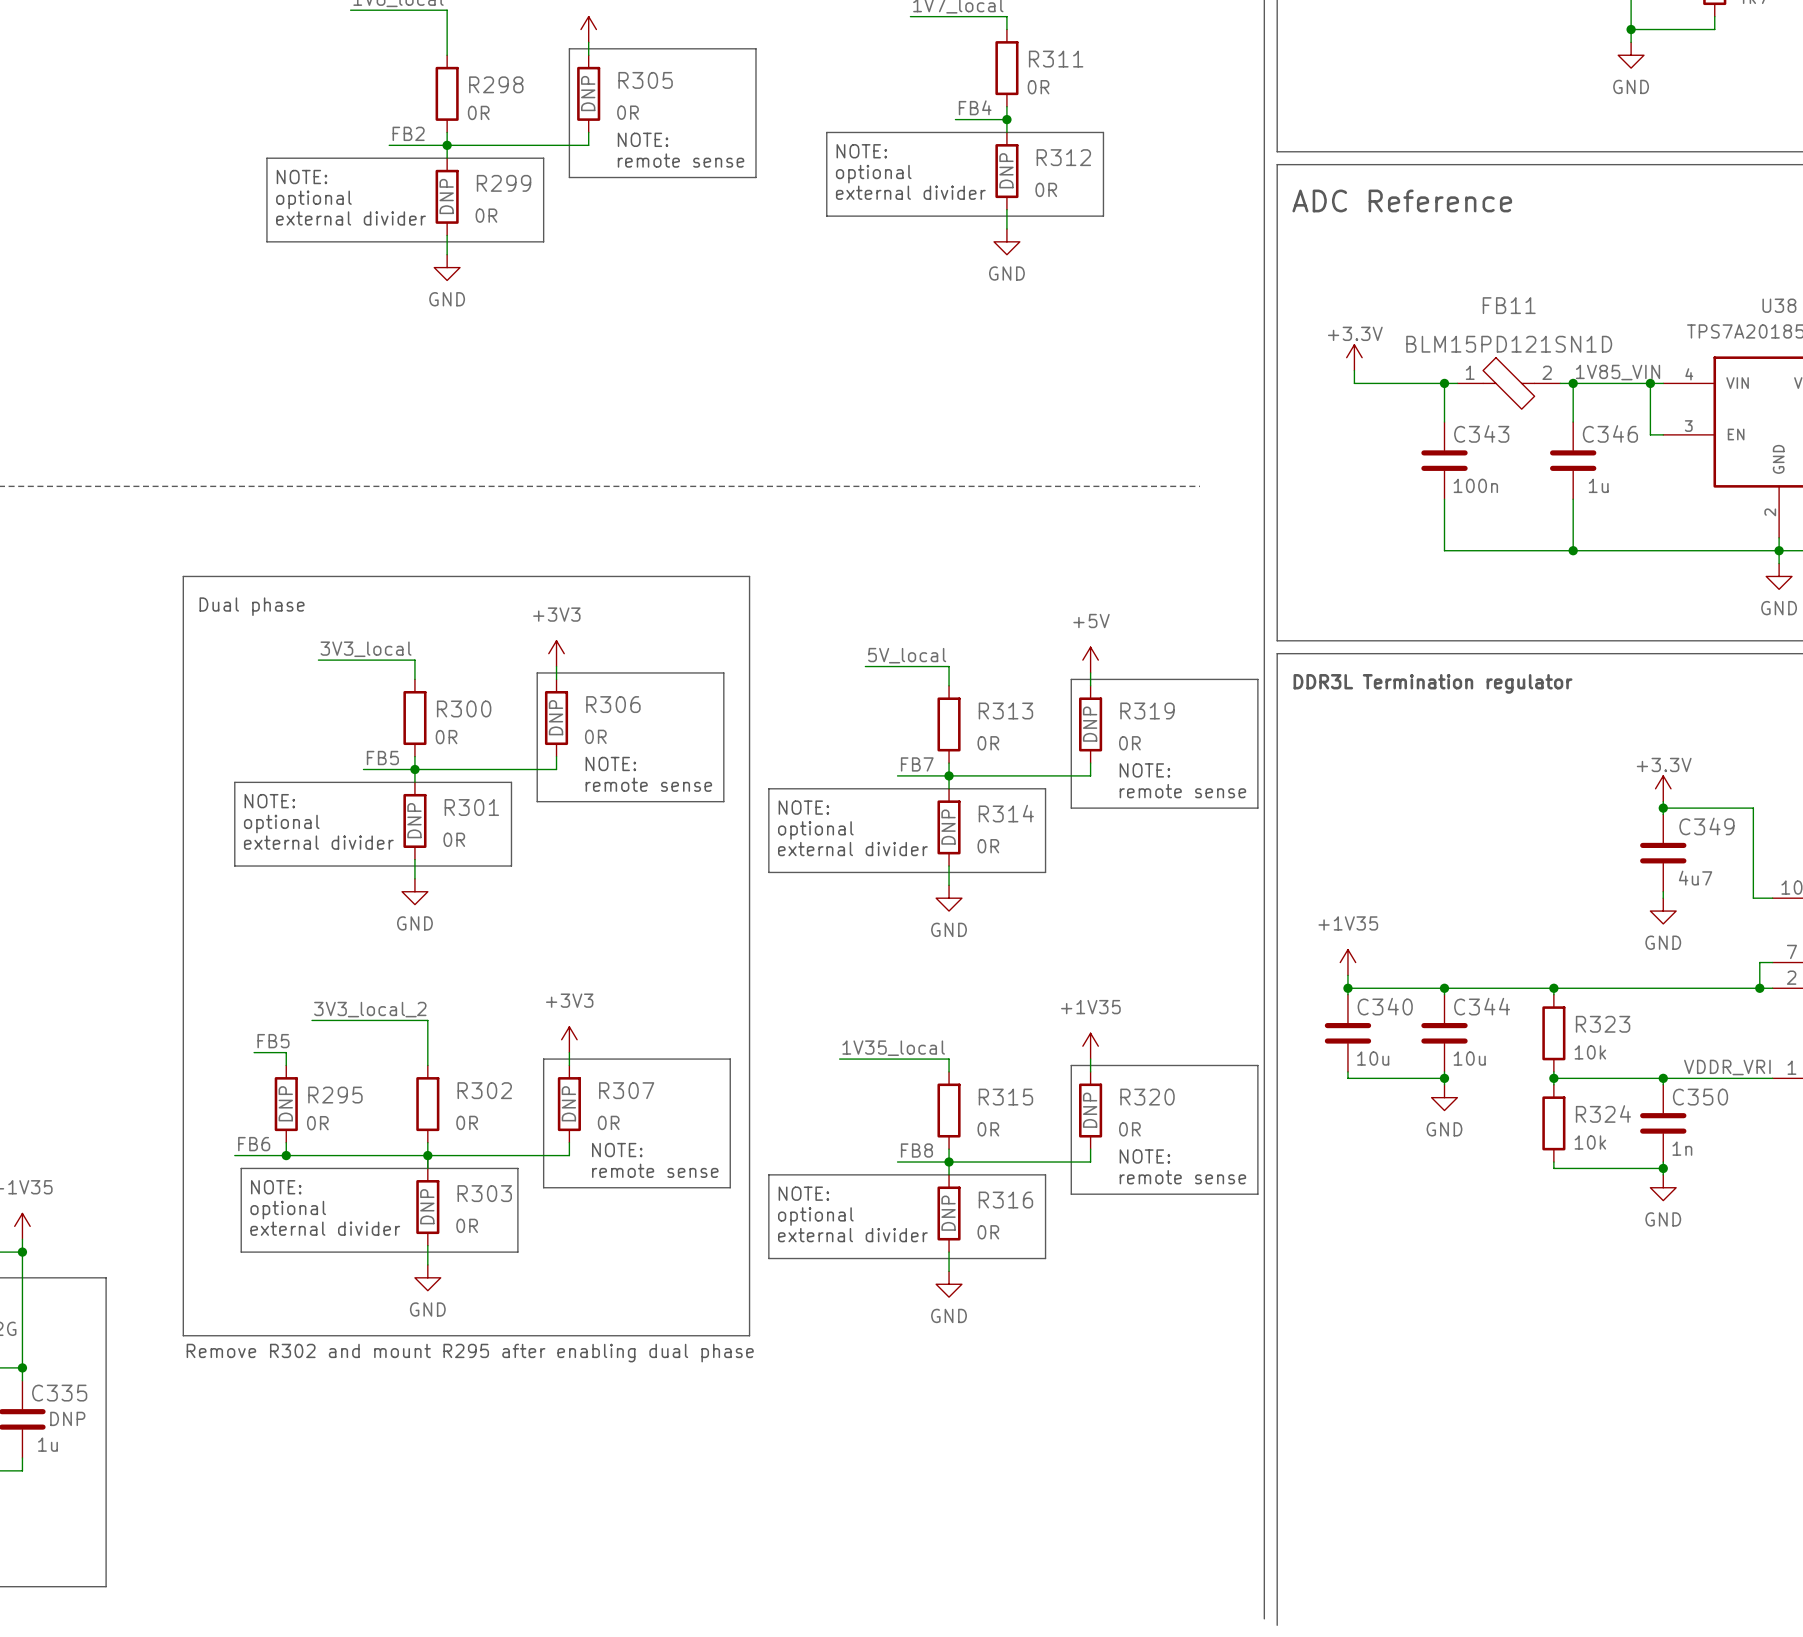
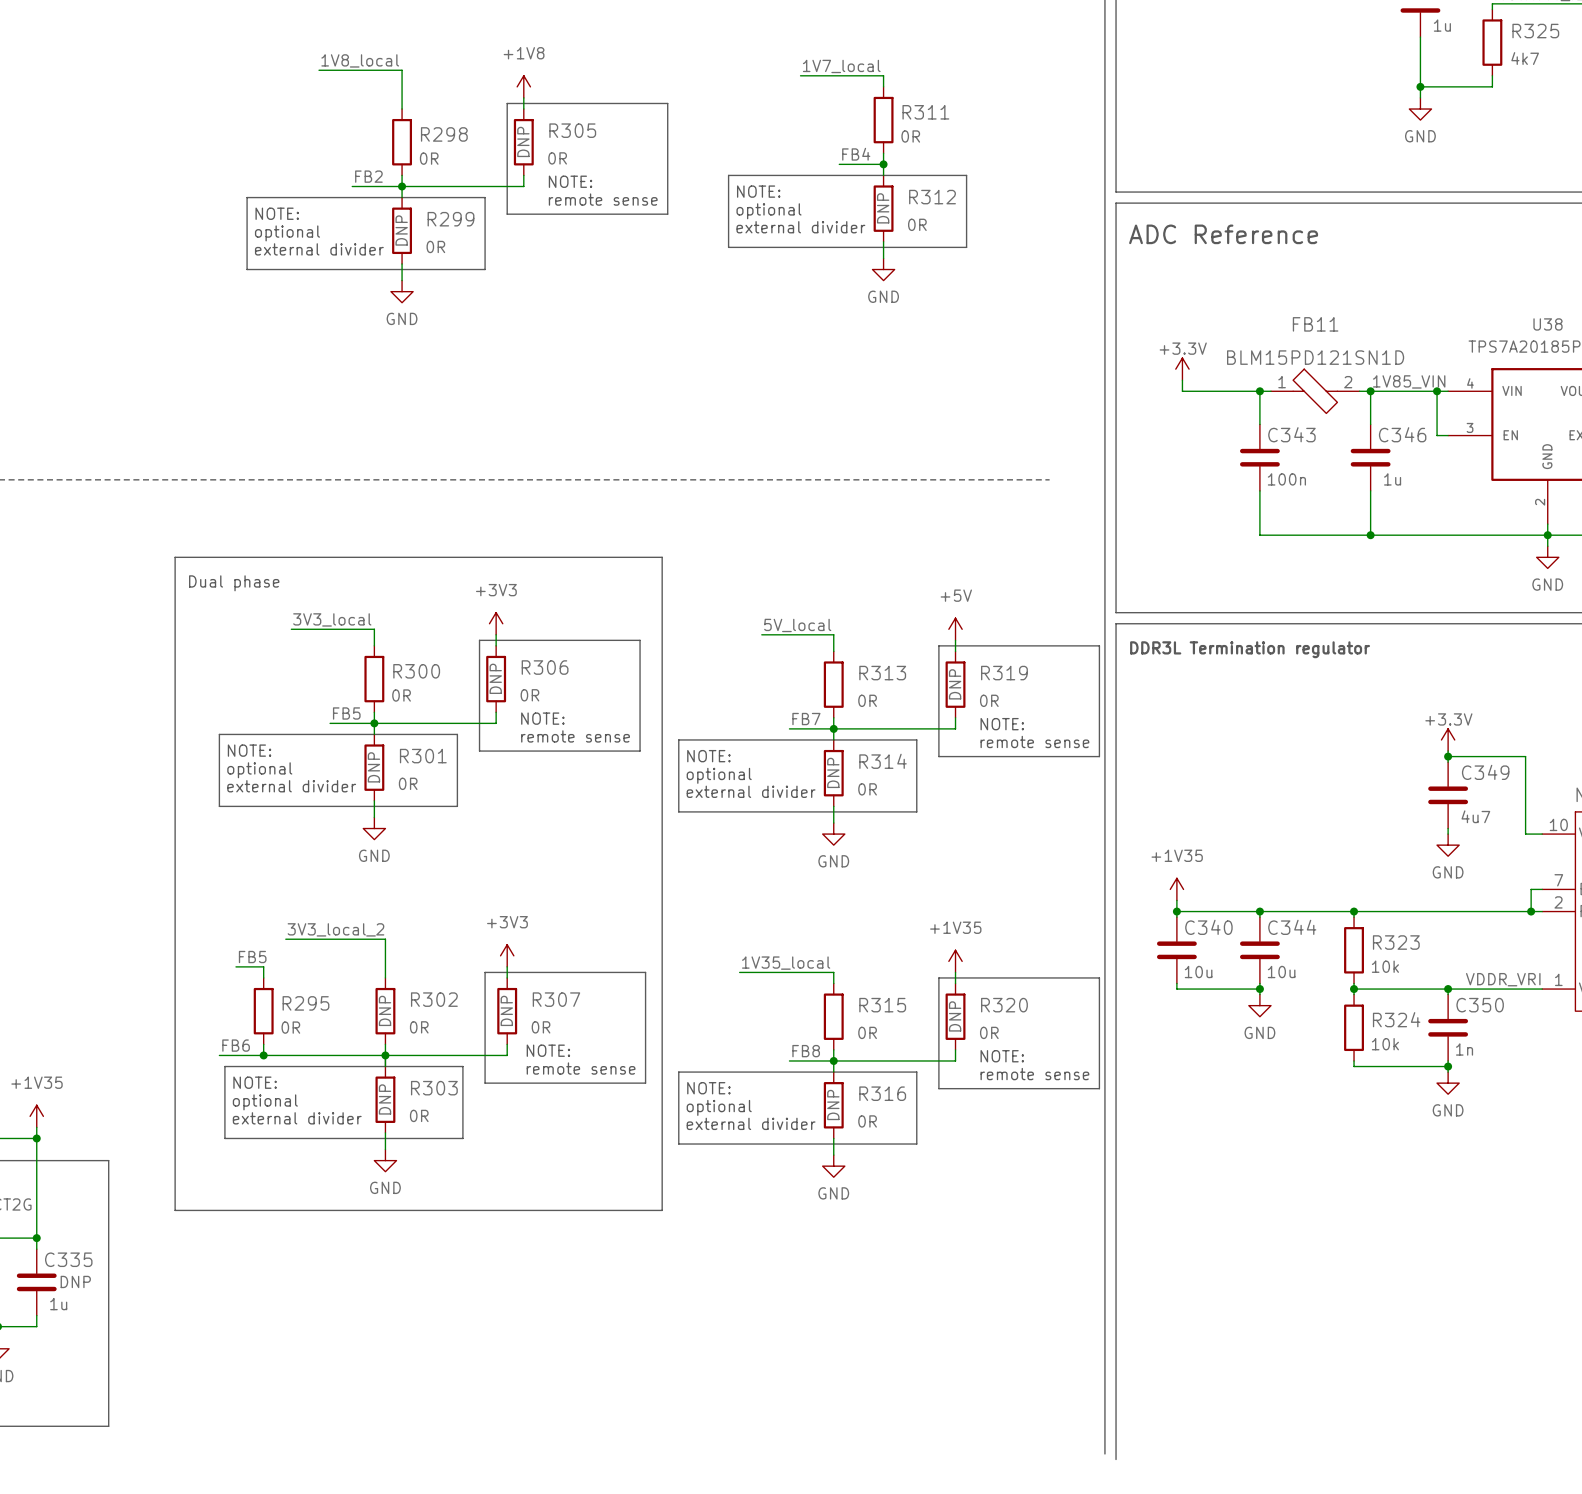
R295 text: DNP (285, 1103) -> none
R302 text: none -> DNP (385, 1010)
text: Remove R302 and mount R295 after enabling dual phase (470, 1353) -> none

